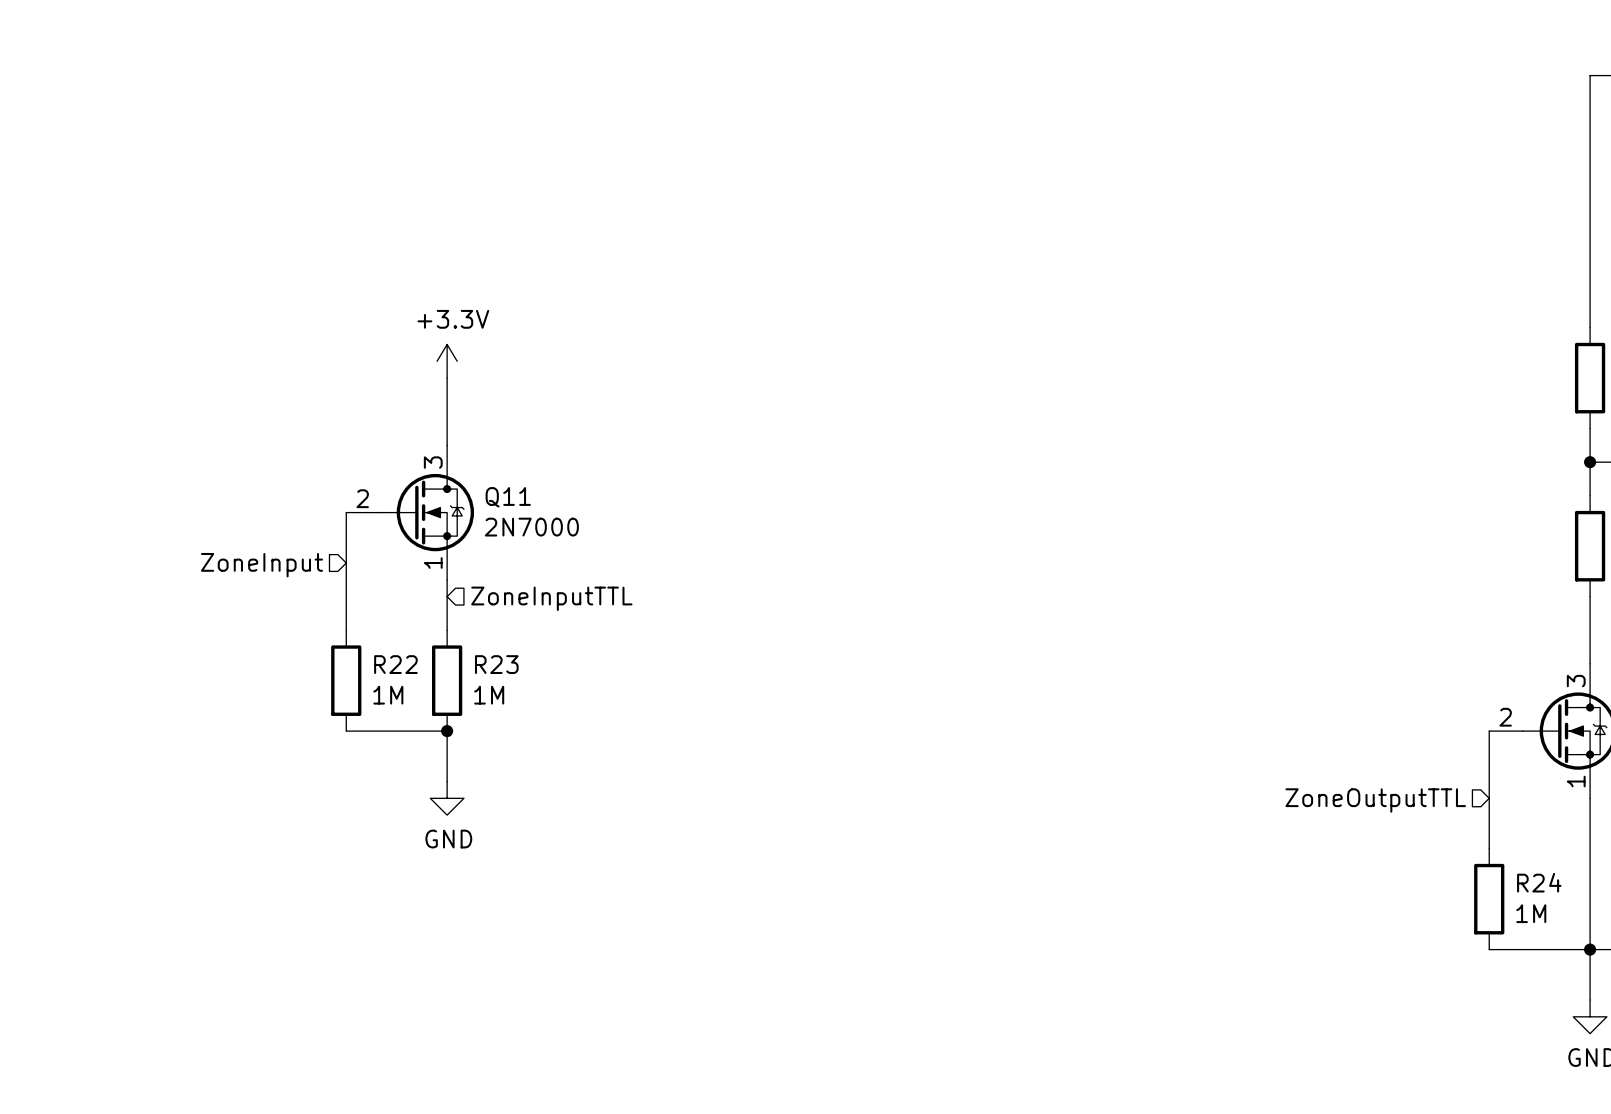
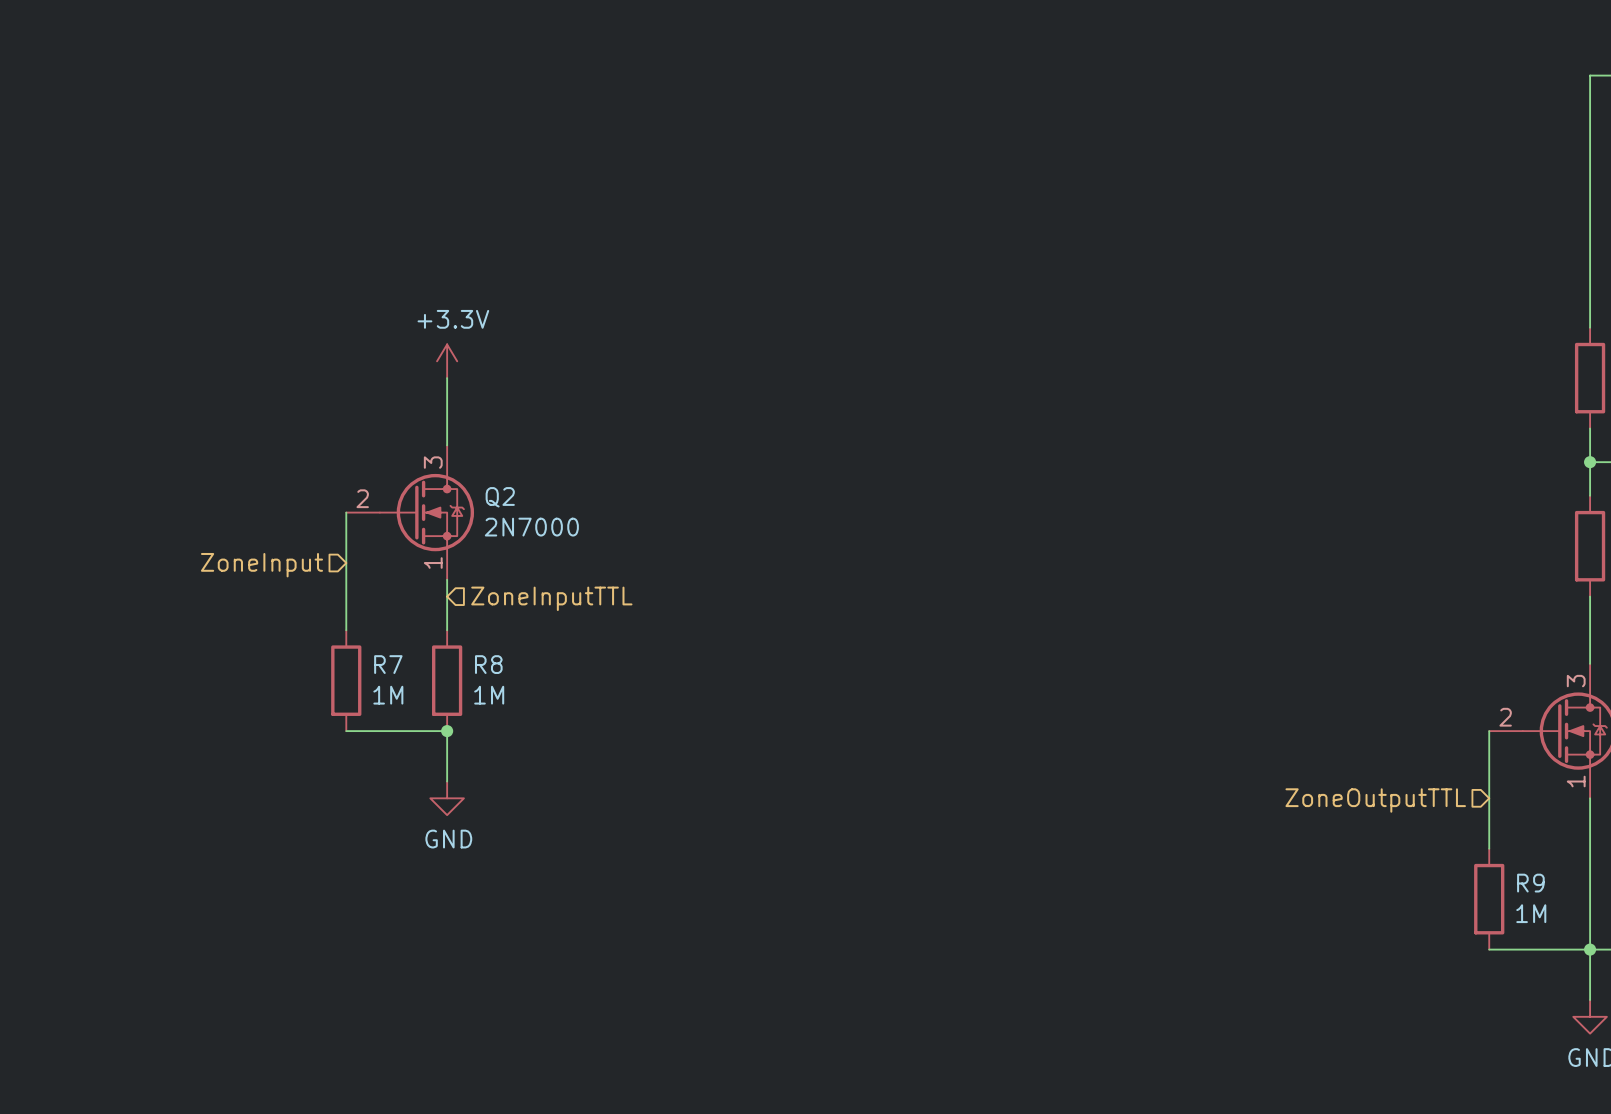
Q11 name: Q11 (508, 497) -> Q2 (500, 497)
R22 name: R22 (395, 664) -> R7 (388, 664)
R23 name: R23 (496, 664) -> R8 (488, 664)
R24 name: R24 (1539, 882) -> R9 (1530, 883)

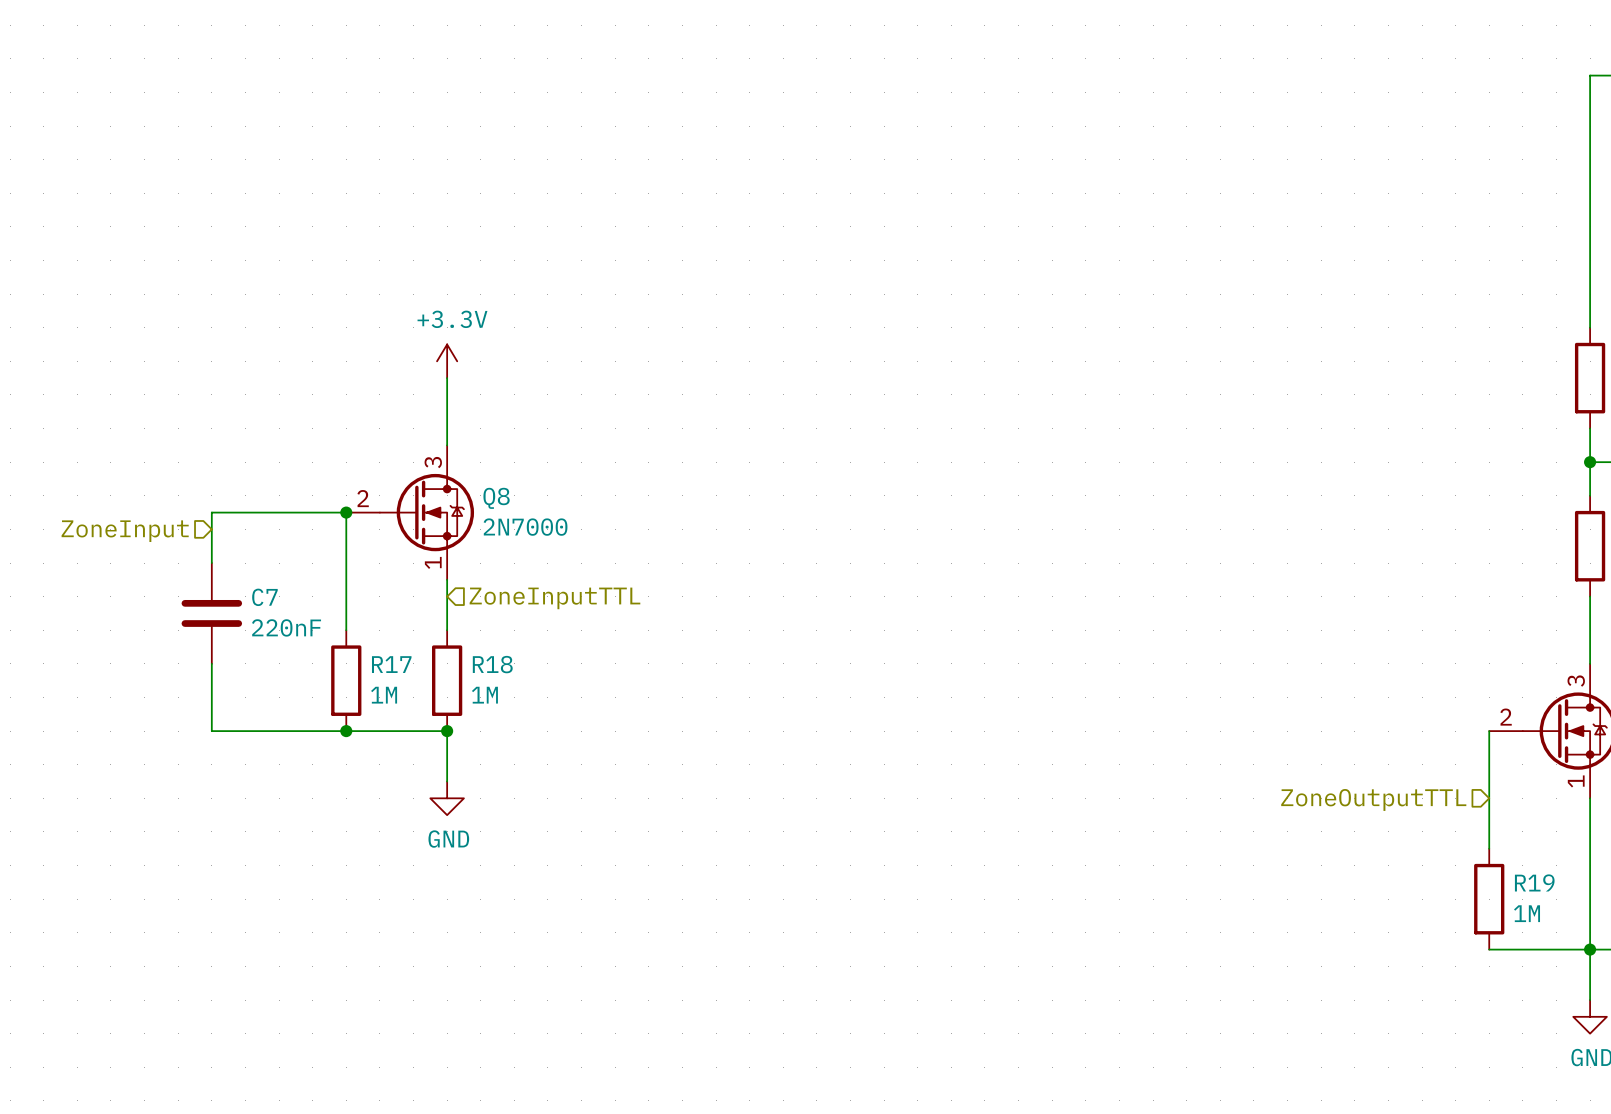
Q2 name: Q2 (500, 497) -> Q8 (496, 498)
wire: none -> (346, 512) (211, 512) (211, 563)
junction: none -> (346, 512)
hierarchical label position: ZoneInput (261, 565) -> ZoneInput (125, 531)
C7: none -> 220nF (211, 613)
wire: none -> (211, 663) (211, 731) (346, 731)
R7 name: R7 (388, 664) -> R17 (391, 664)
R8 name: R8 (488, 664) -> R18 (492, 664)
junction: none -> (346, 731)
R9 name: R9 (1530, 883) -> R19 (1534, 882)

